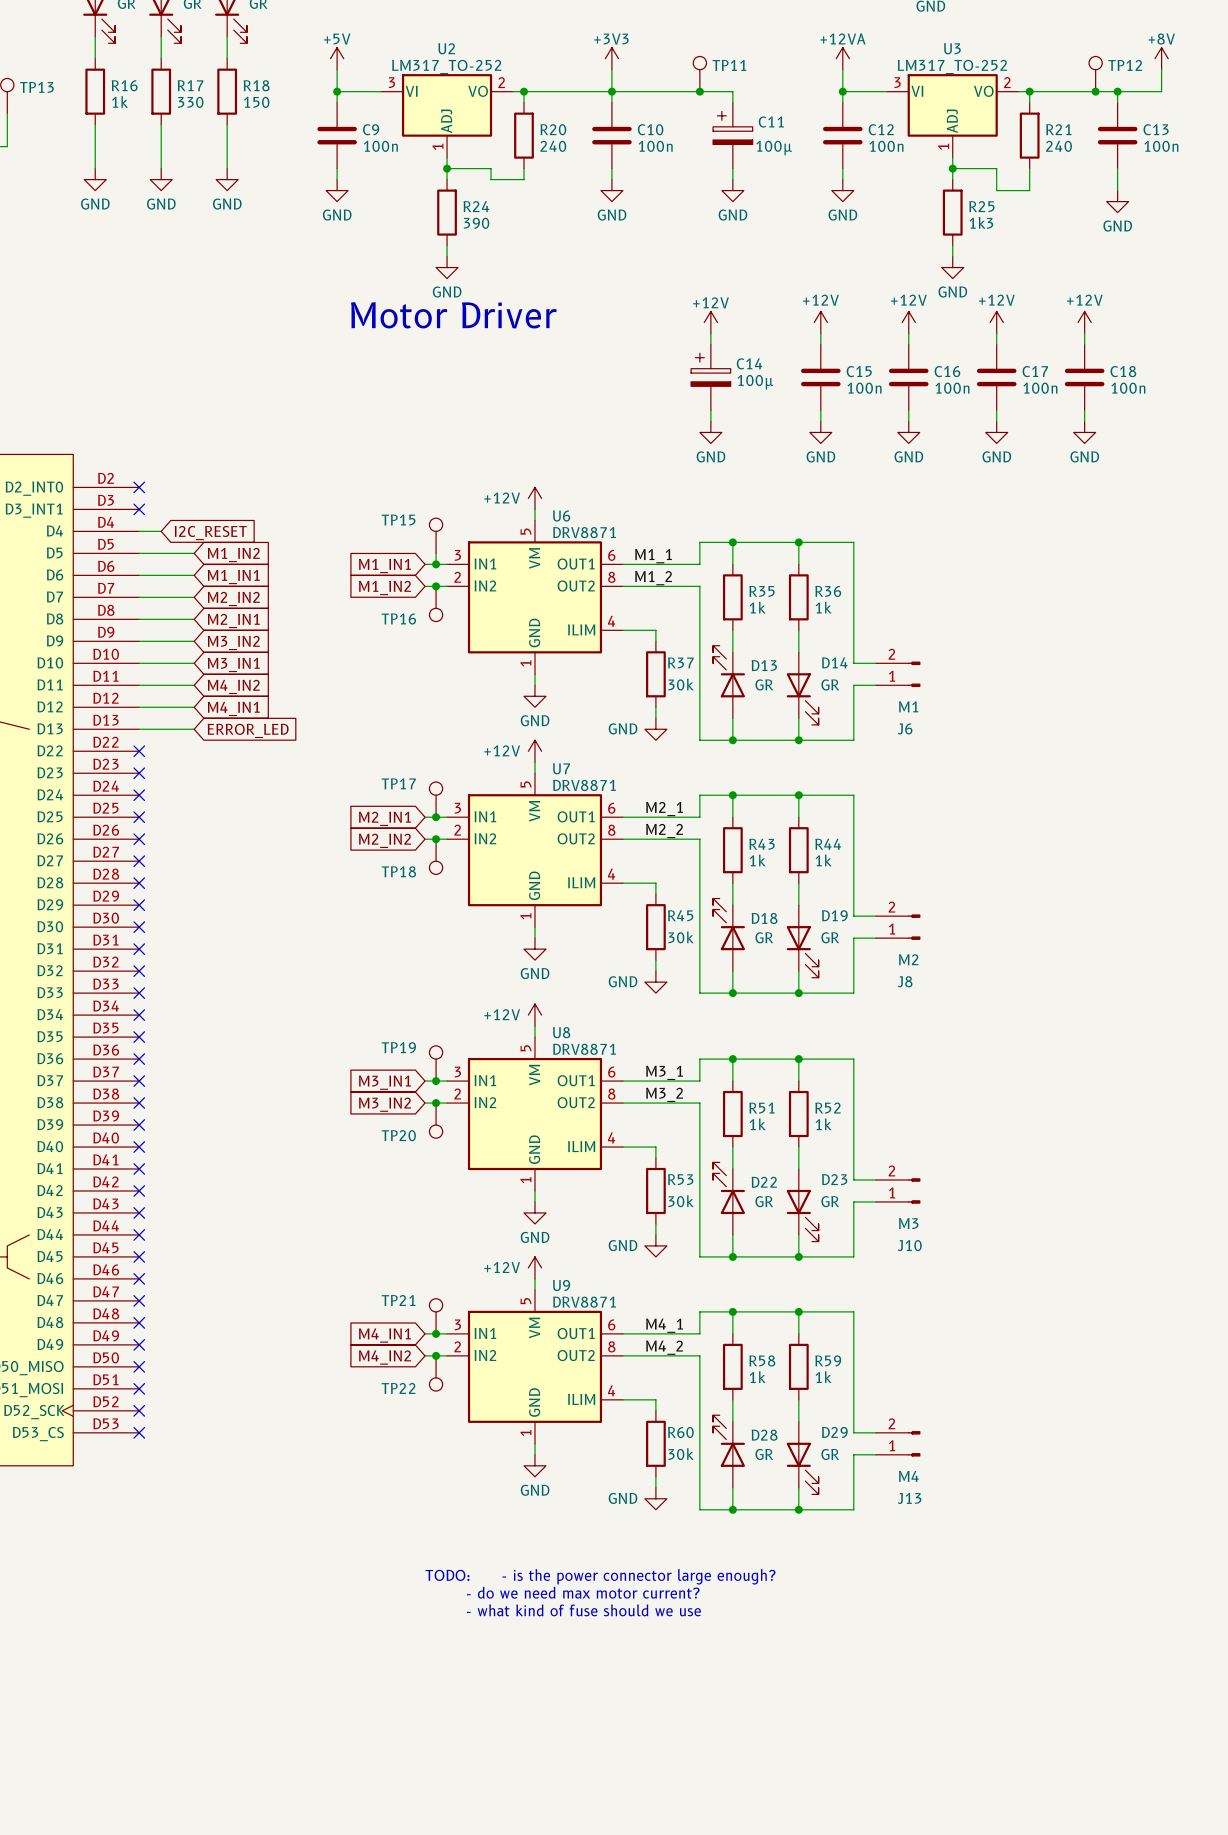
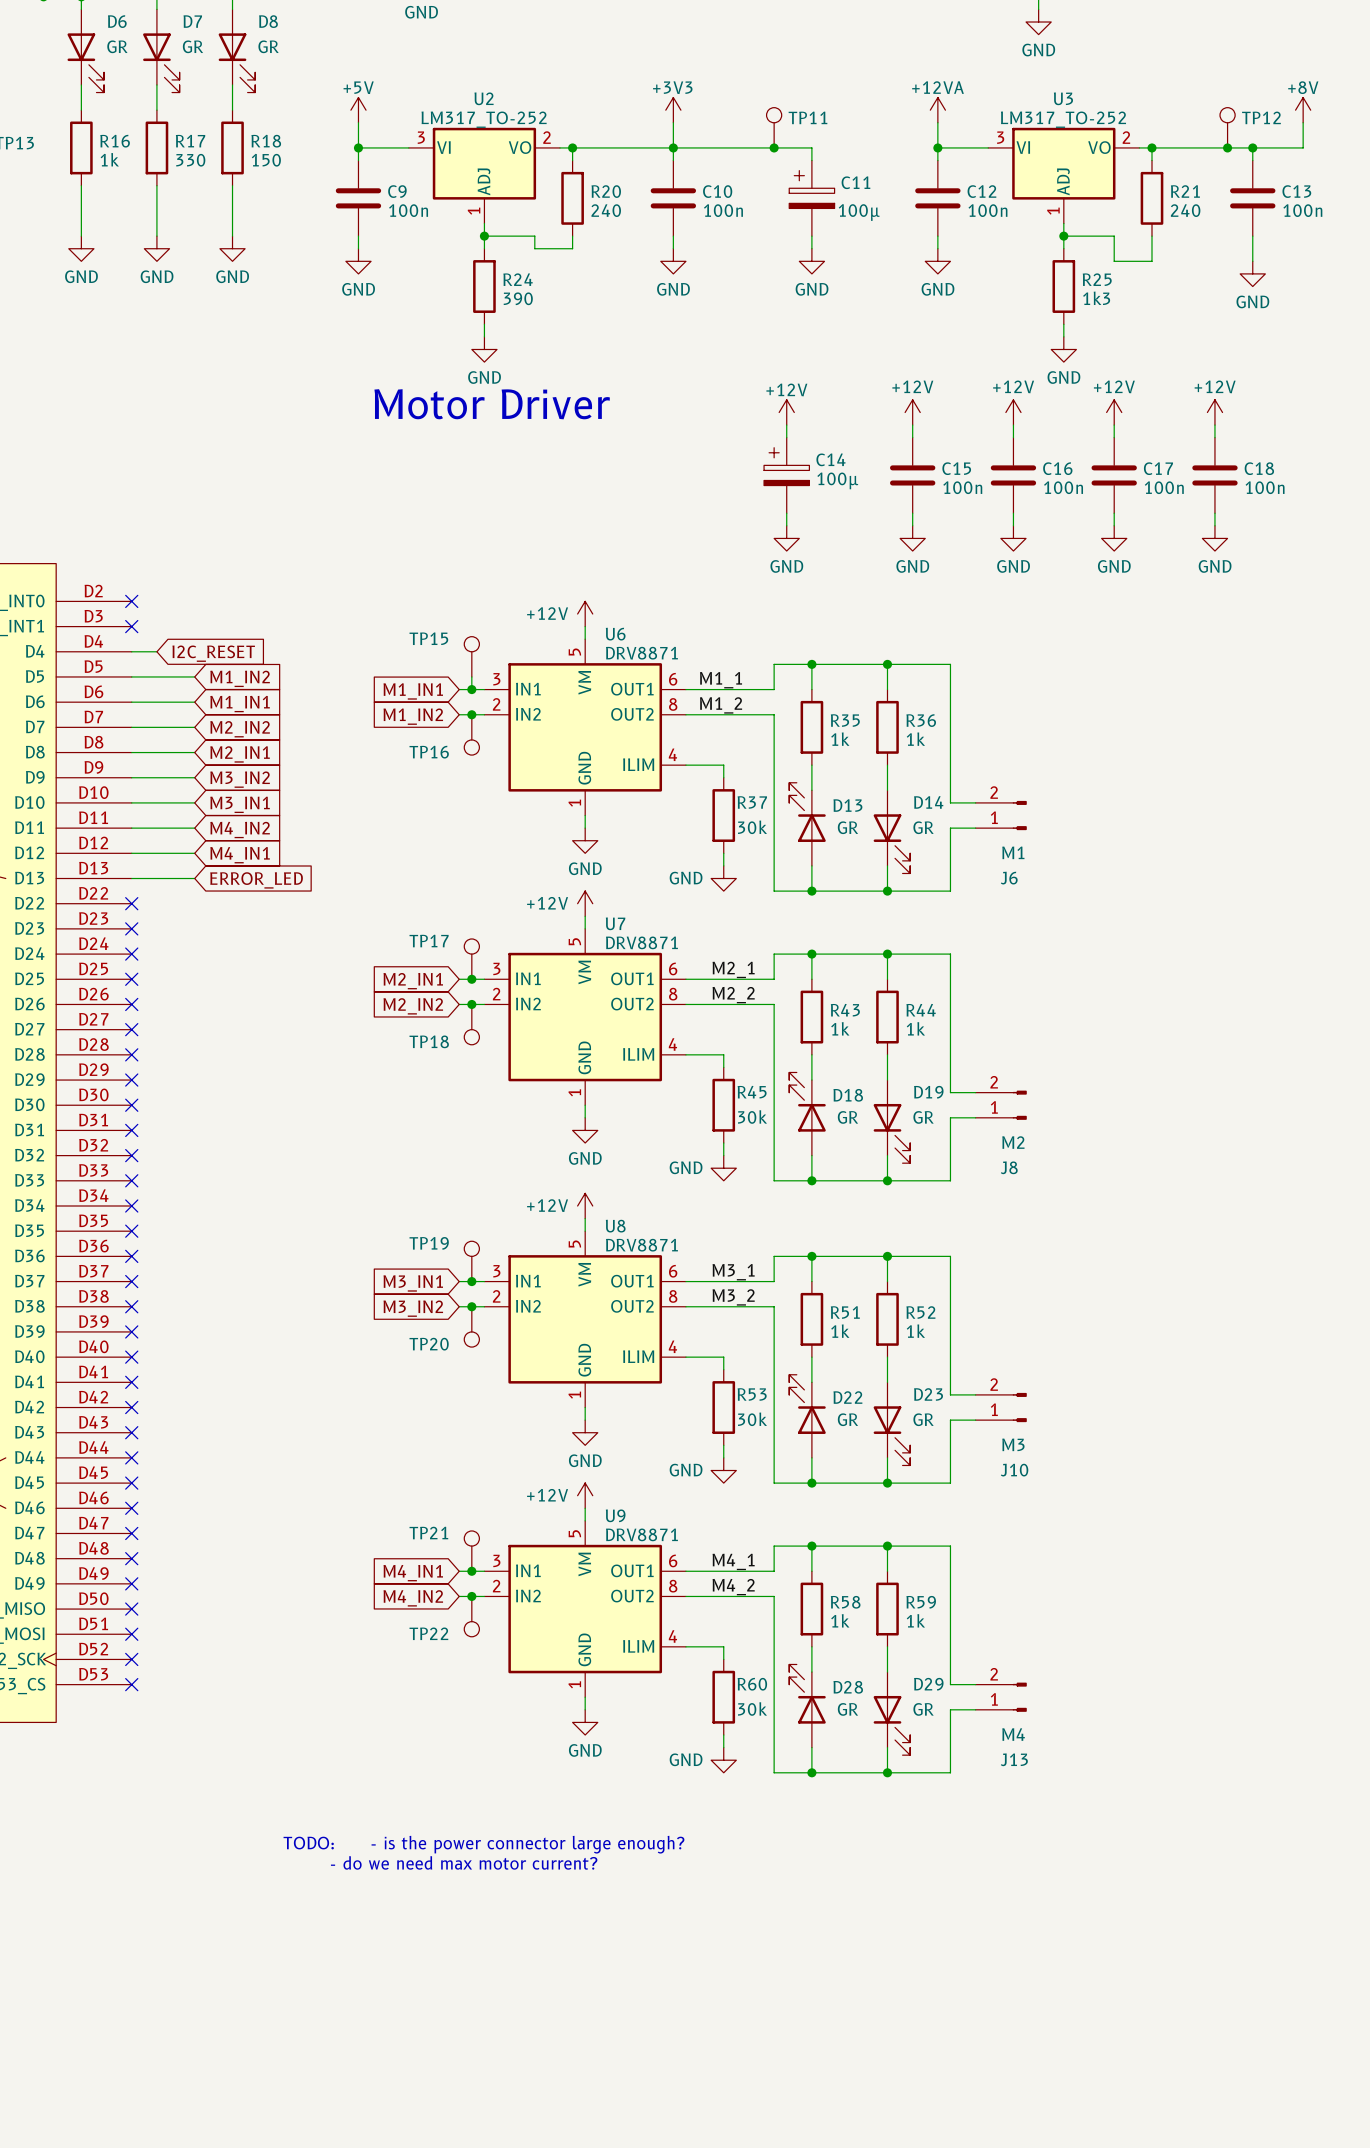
text position: TODO: - is the power connector large enough? (600, 1576) -> TODO: - is the power connector large enough? (483, 1844)
text position: - do we need max motor current? (583, 1592) -> - do we need max motor current? (464, 1862)
text: - what kind of fuse should we use (583, 1610) -> none

